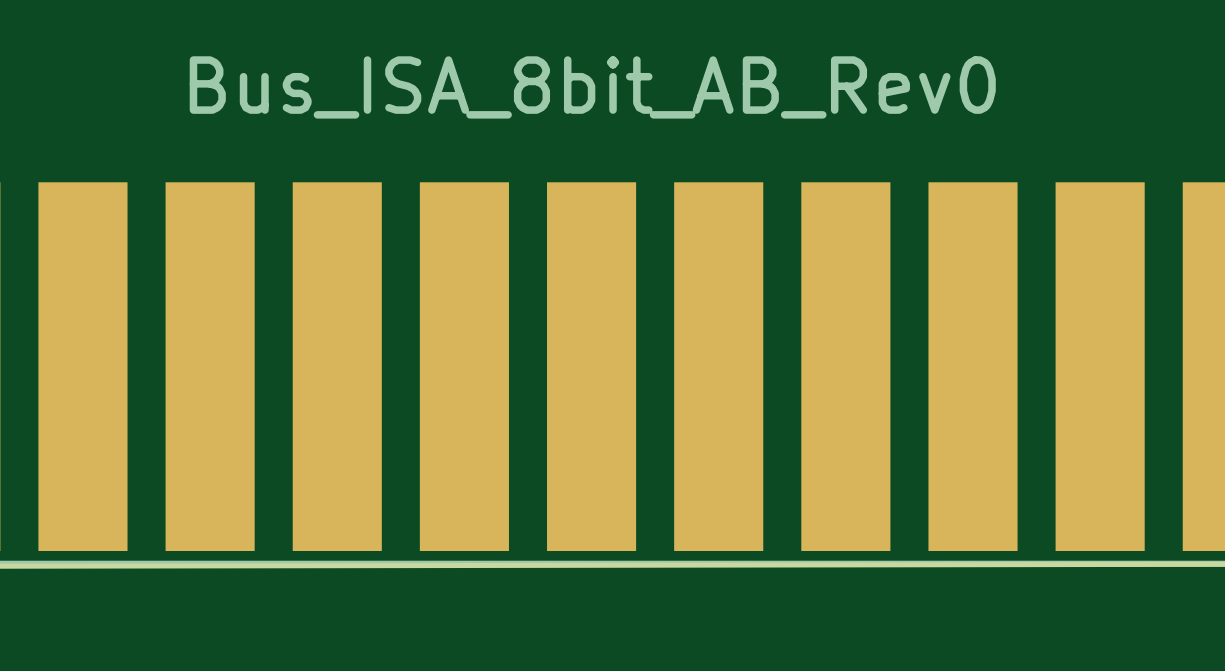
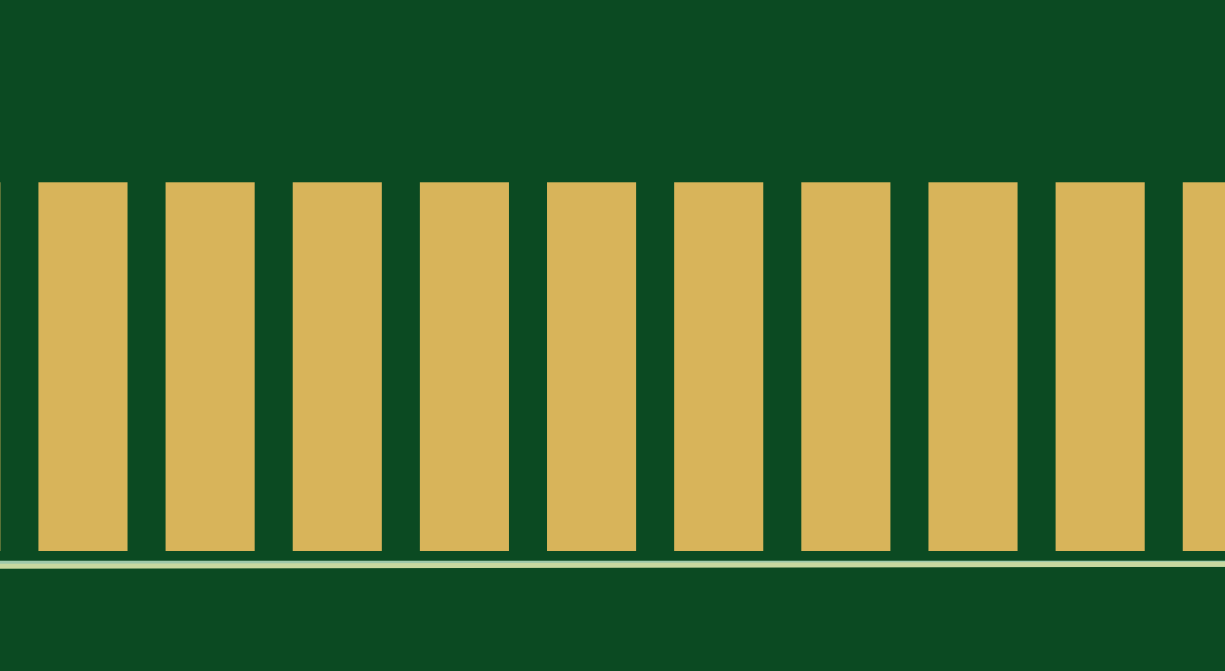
part value: Bus_ISA_8bit_AB_Rev0 (592, 87) -> none

